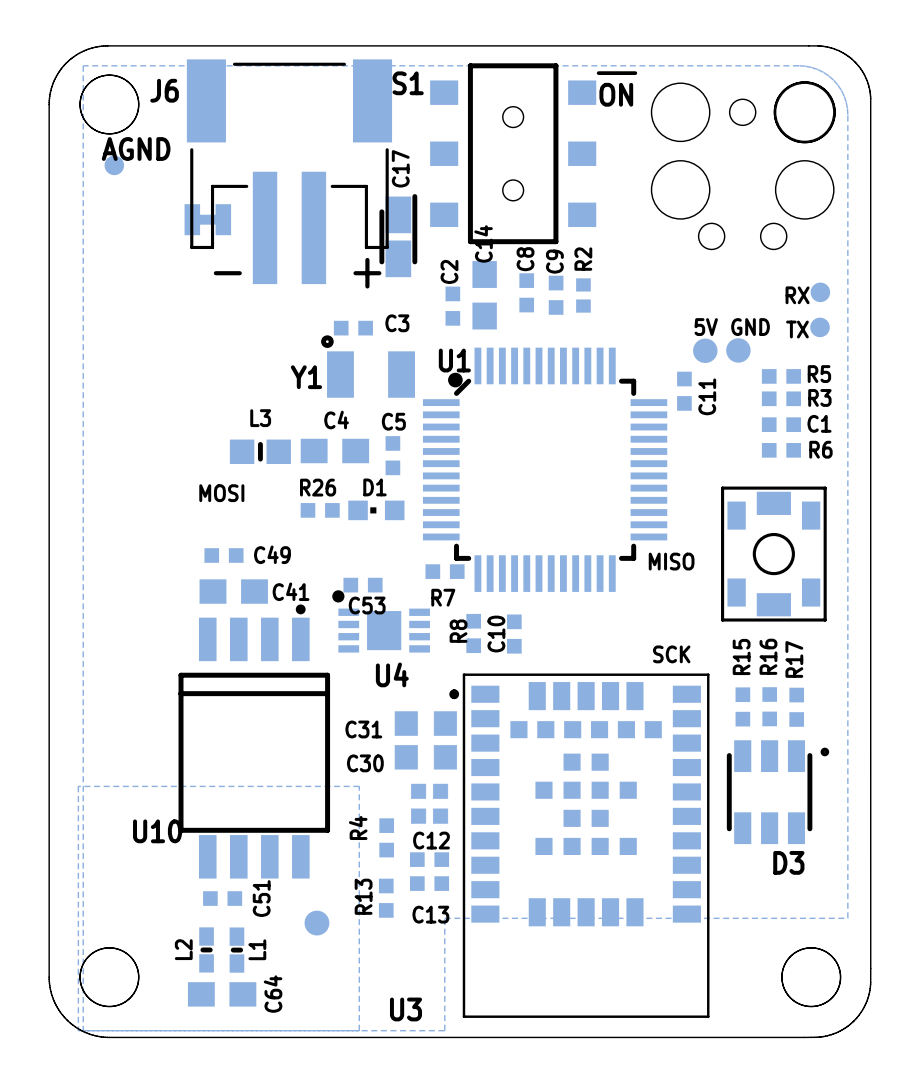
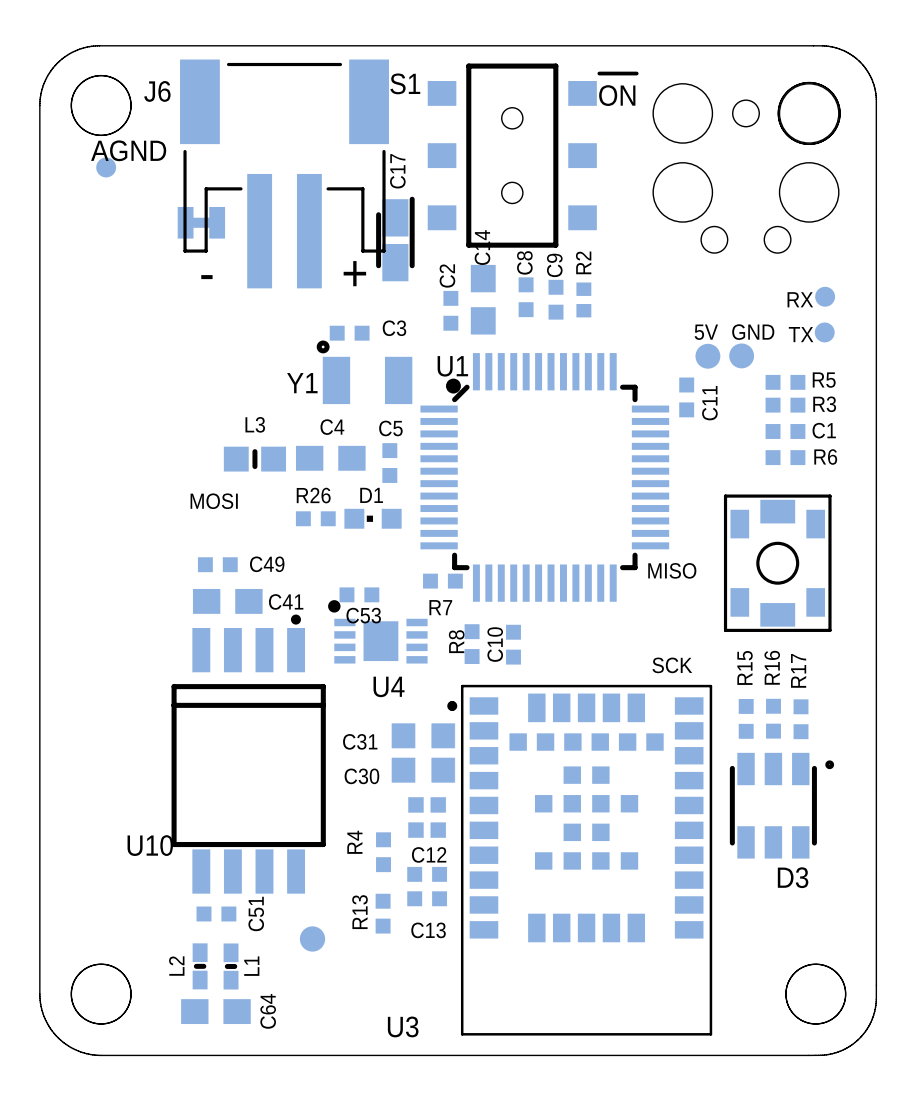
zone outline: (359, 1030) (359, 786) (78, 786) (78, 1030) (444, 1030) (444, 918) (847, 918) (847, 114) (846, 102) (841, 90) (828, 75) (817, 69) (798, 65) (83, 65) (83, 1030) -> none

